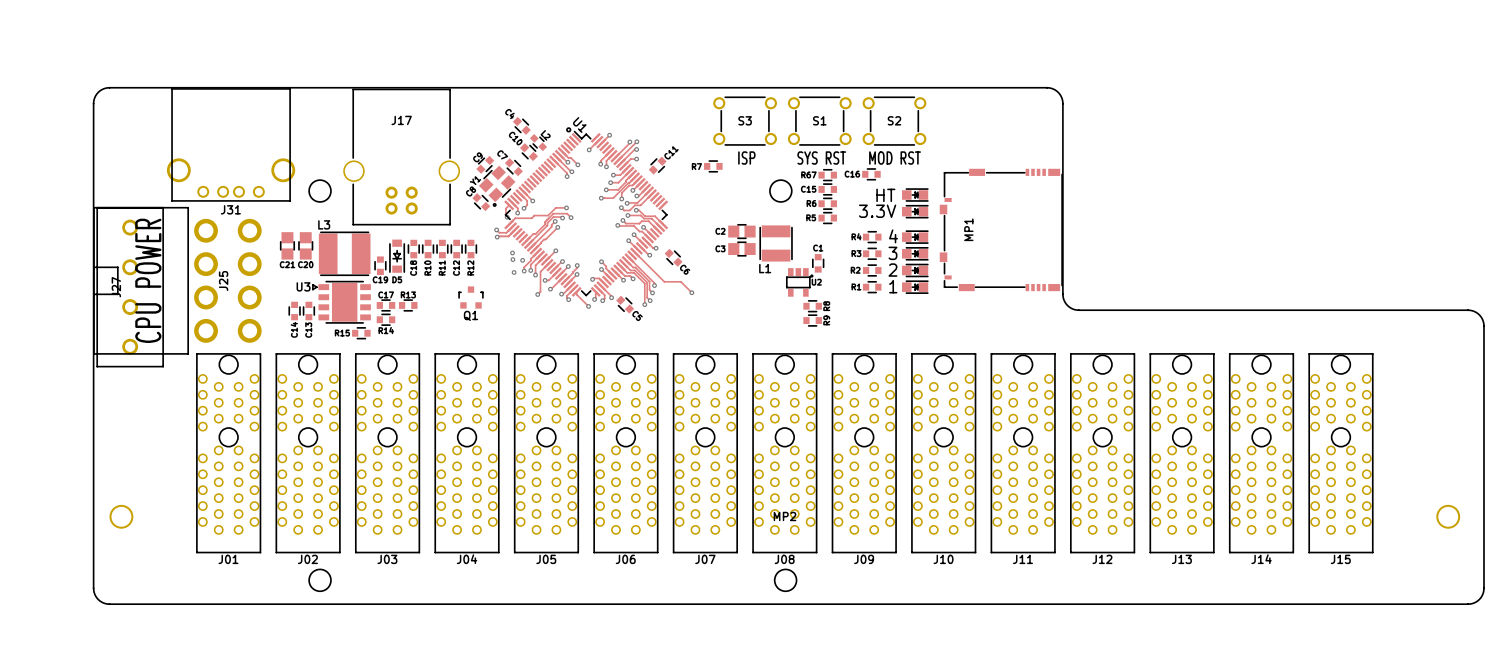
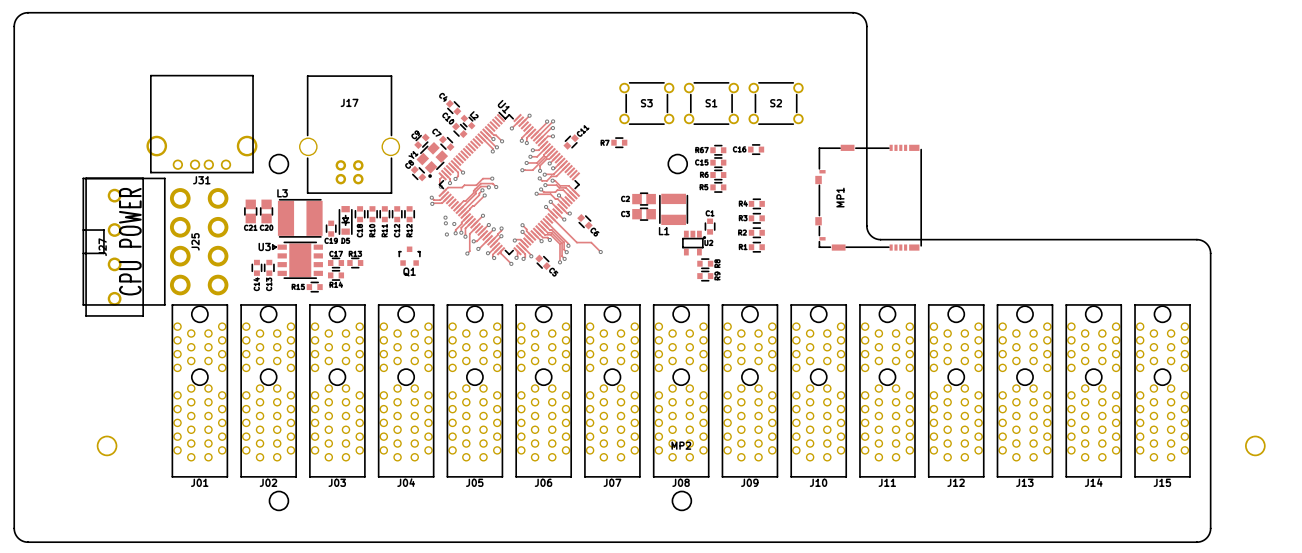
board edge: (109, 87) (1053, 88) (1059, 93) (1062, 101) (1062, 294) (1065, 302) (1070, 308) (1078, 310) (1468, 310) (1476, 312) (1480, 316) (1483, 326) (1482, 594) (1477, 600) (1468, 604) (103, 602) (96, 597) (93, 588) (93, 103) (98, 92) (109, 87) -> (27, 12) (18, 16) (14, 26) (14, 528) (17, 536) (22, 541) (1196, 542) (1205, 539) (1209, 533) (1210, 253) (1207, 245) (1196, 239) (880, 239) (873, 237) (868, 232) (866, 225) (866, 24) (864, 18) (858, 13) (27, 12)
drawing: [566, 127, 572, 133] -> none
text: ISP (746, 158) -> none
text: SYS RST (821, 158) -> none
text: MOD RST (895, 158) -> none
text: HT (885, 195) -> none
part: (915, 195) -> none
text: 3.3V (877, 211) -> none
part: (915, 211) -> none
text: 4 (893, 236) -> none
part: (915, 237) -> none
text: 3 (892, 253) -> none
part: (915, 253) -> none
text: 2 (892, 270) -> none
part: (915, 270) -> none
text: 1 (893, 286) -> none
part: (915, 287) -> none

